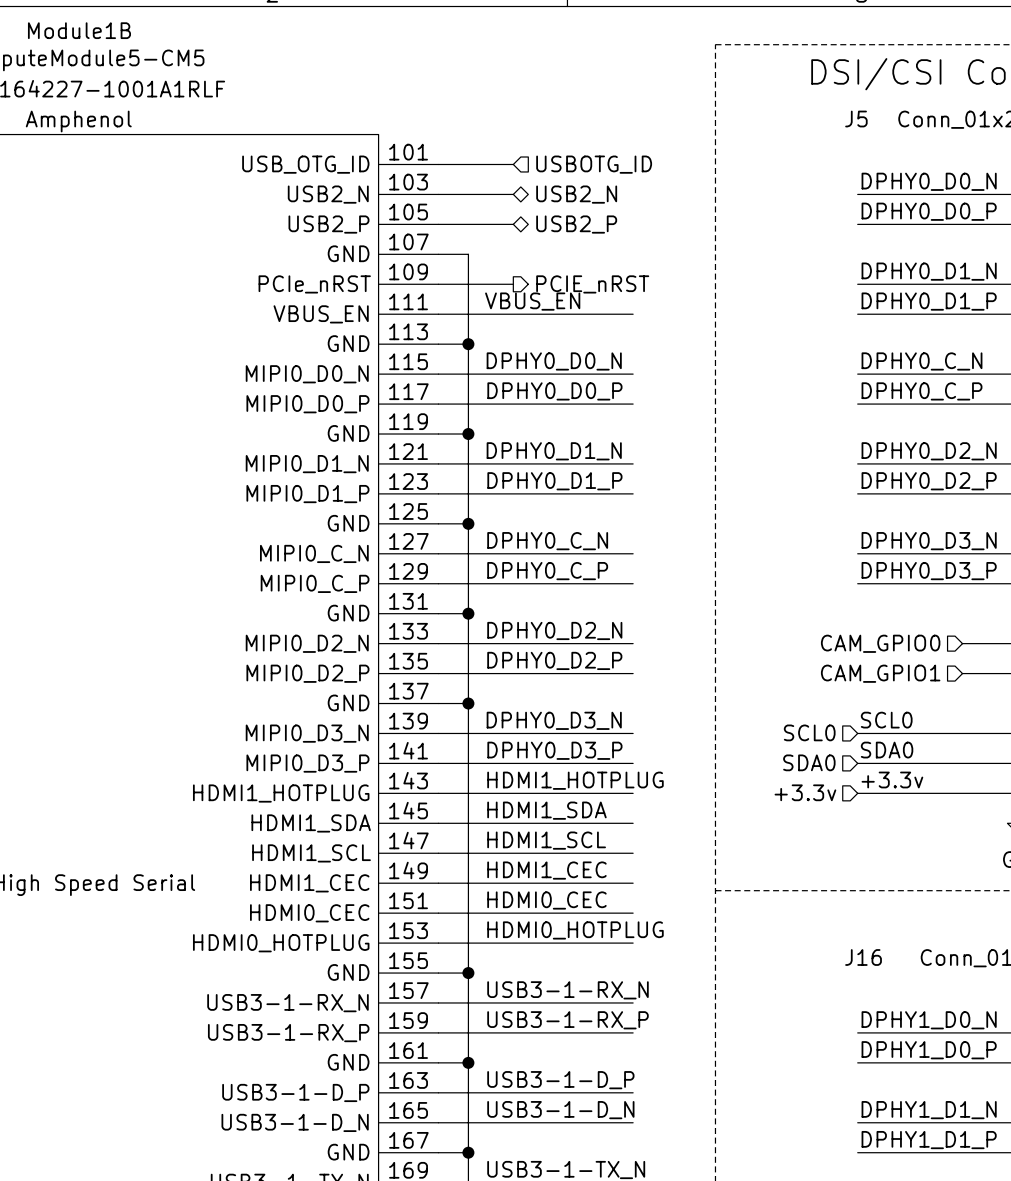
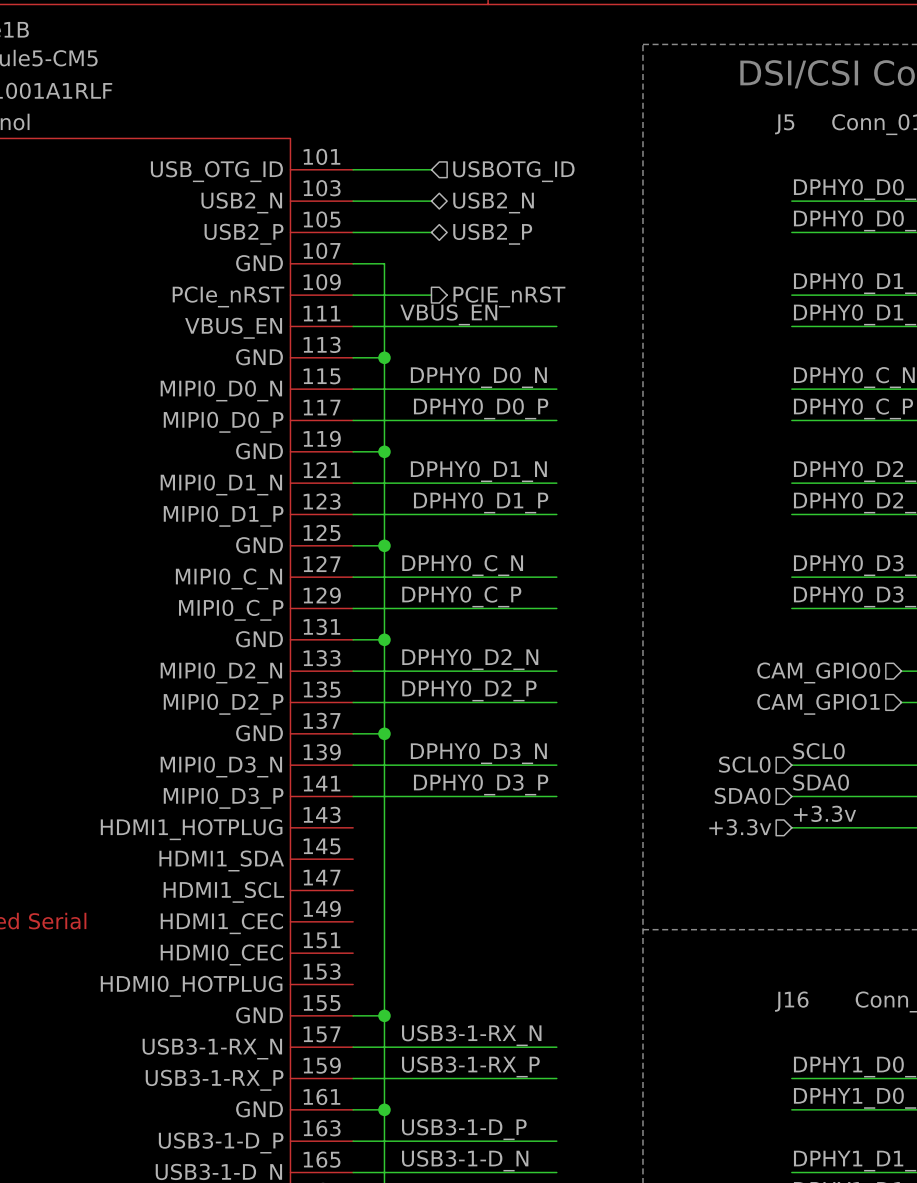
label: HDMI1_HOTPLUG (575, 780) -> none
wire: (438, 793) (633, 793) -> none
label: HDMI1_SDA (546, 810) -> none
wire: (438, 823) (633, 823) -> none
label: HDMI1_SCL (546, 840) -> none
wire: (438, 853) (633, 853) -> none
label: HDMI1_CEC (546, 870) -> none
wire: (438, 883) (633, 883) -> none
label: HDMI0_CEC (546, 900) -> none
wire: (438, 913) (633, 913) -> none
label: HDMI0_HOTPLUG (575, 930) -> none
wire: (438, 943) (633, 943) -> none

